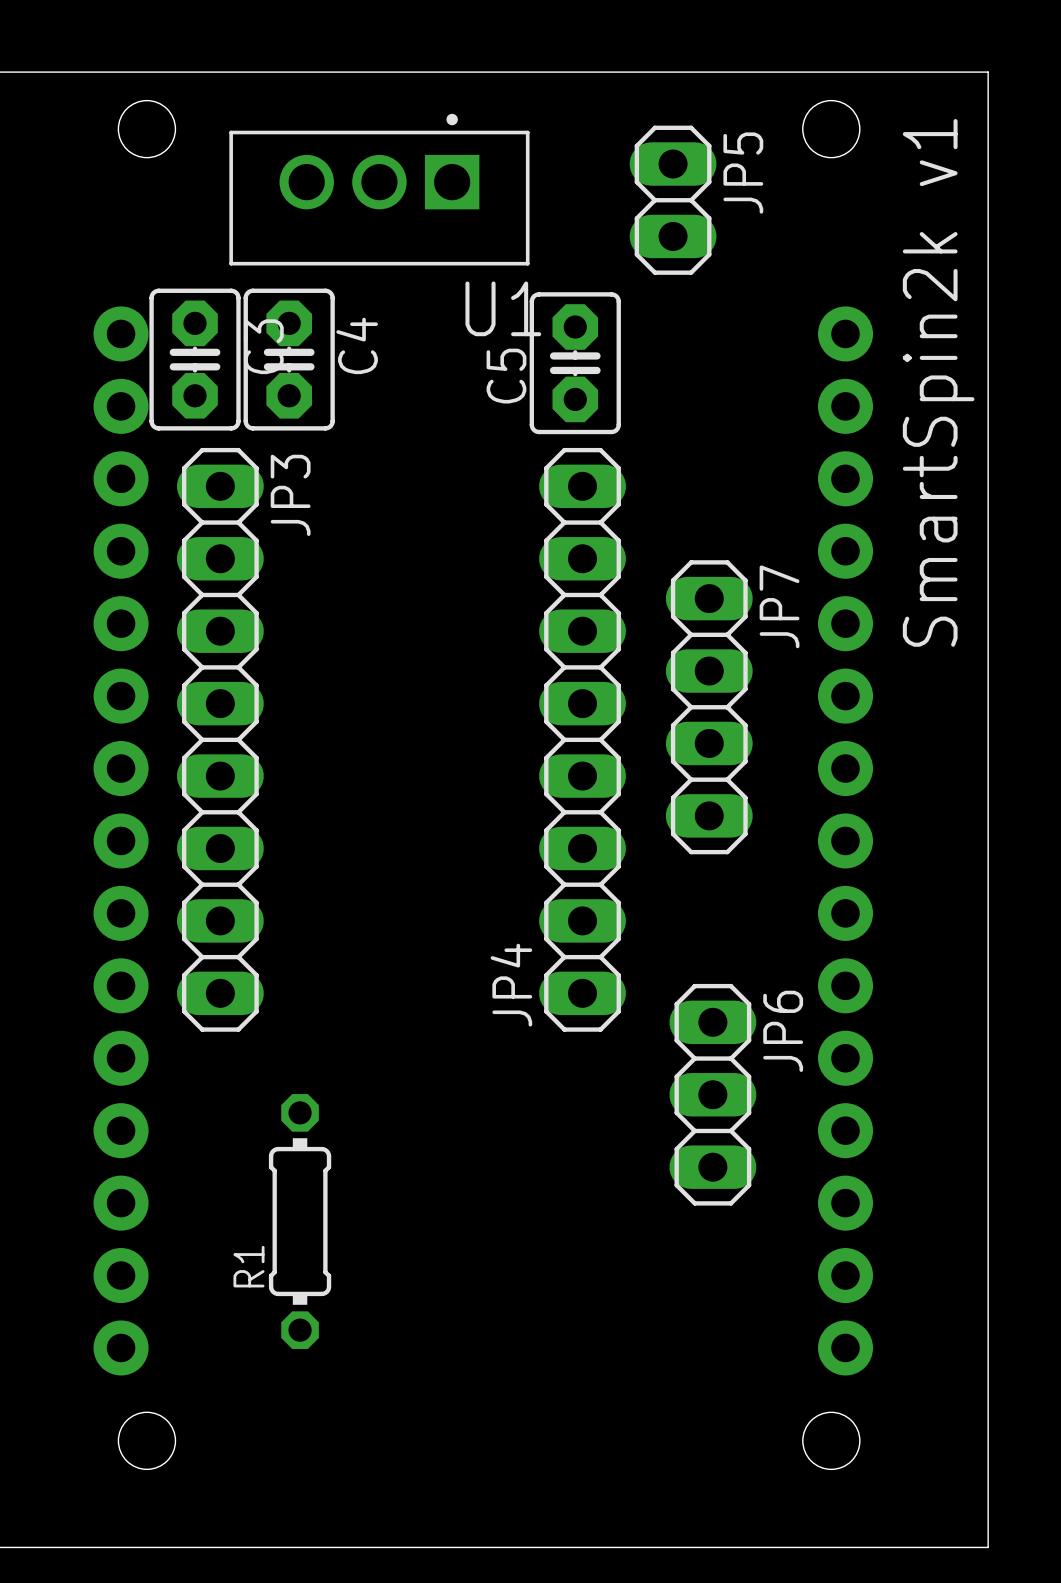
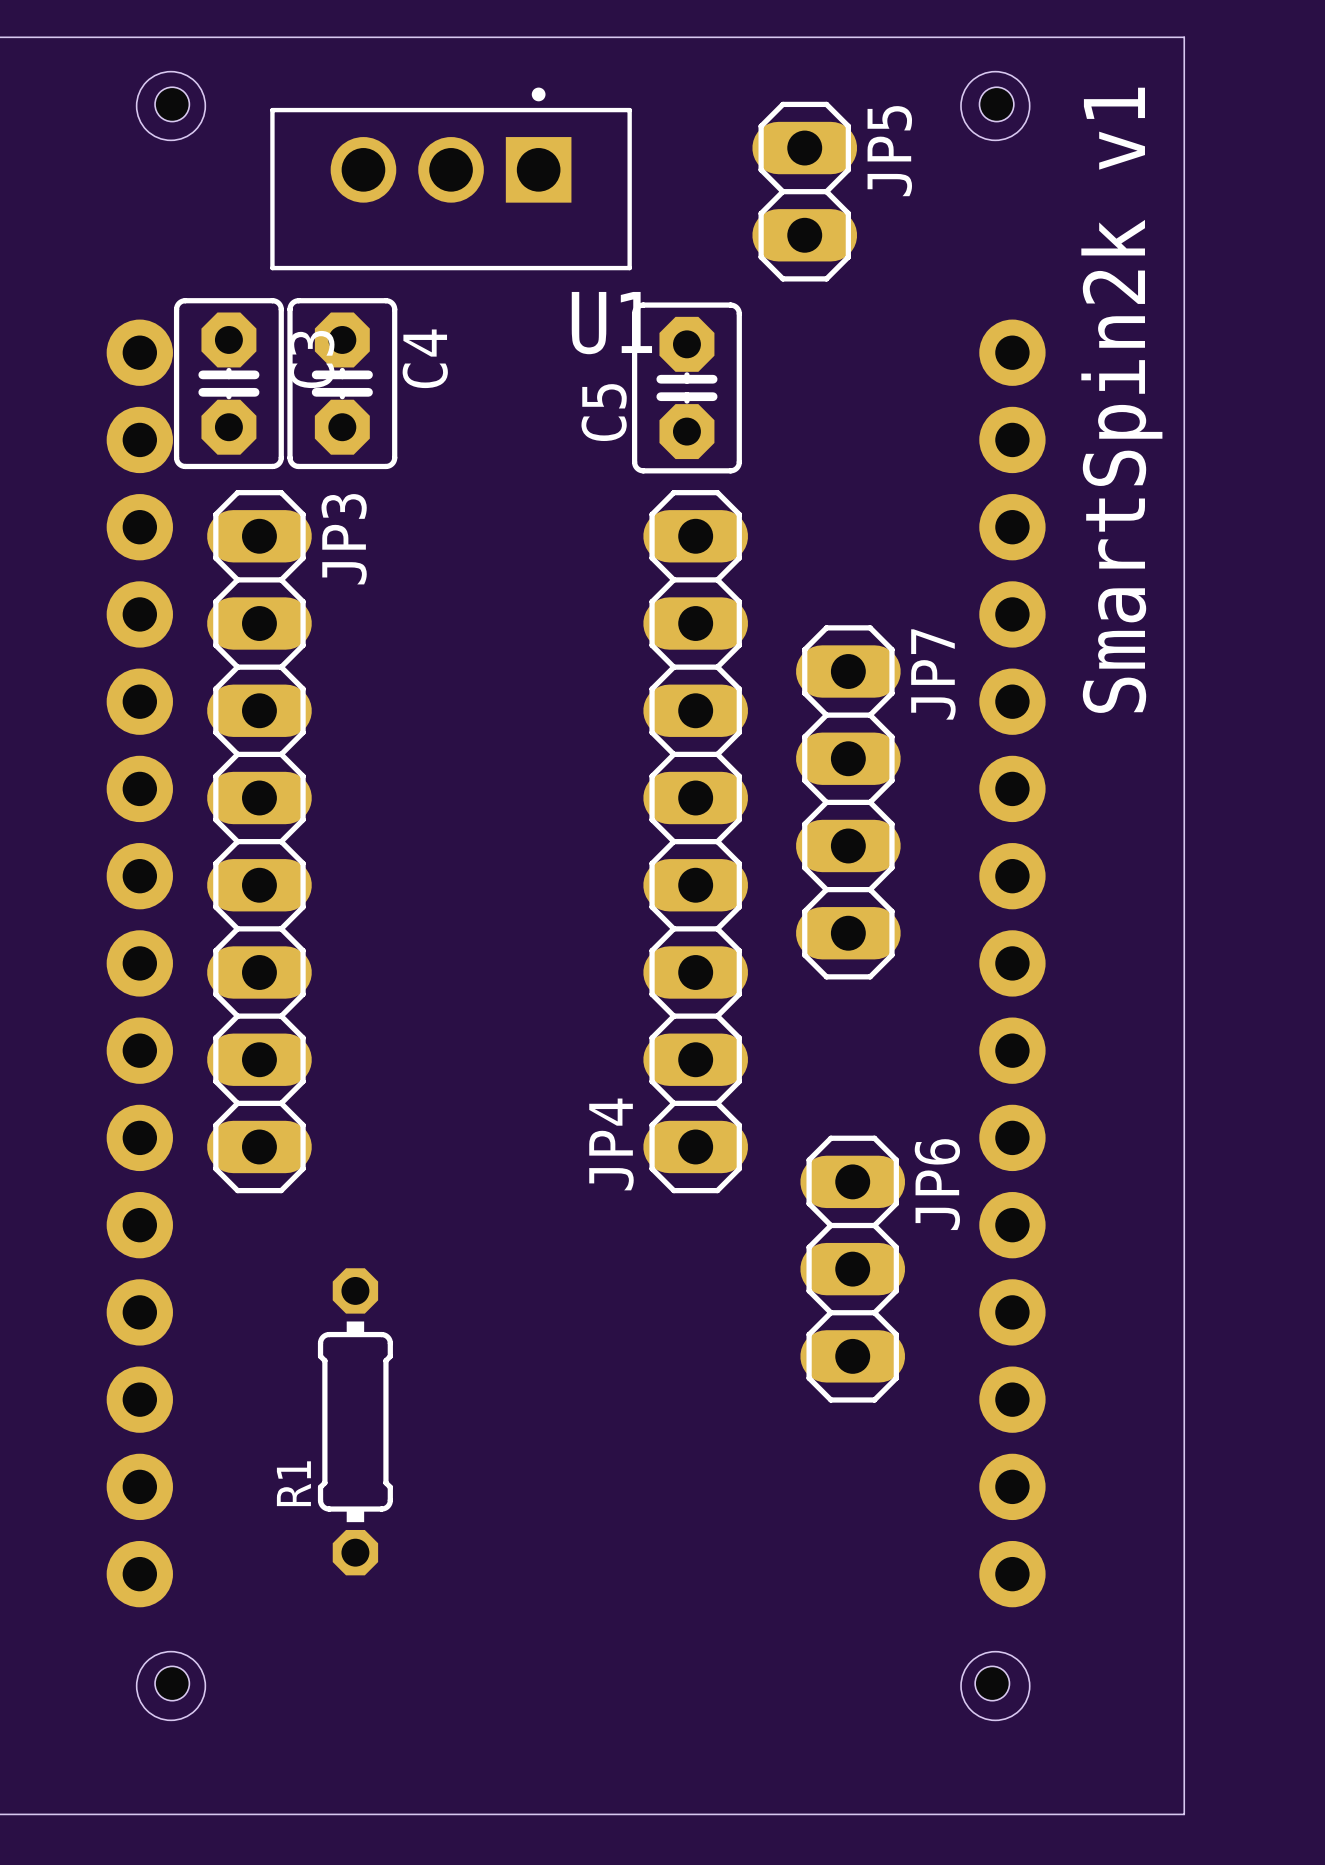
hole: none -> (172, 104)
hole: none -> (996, 104)
hole: none -> (172, 1683)
hole: none -> (992, 1683)

